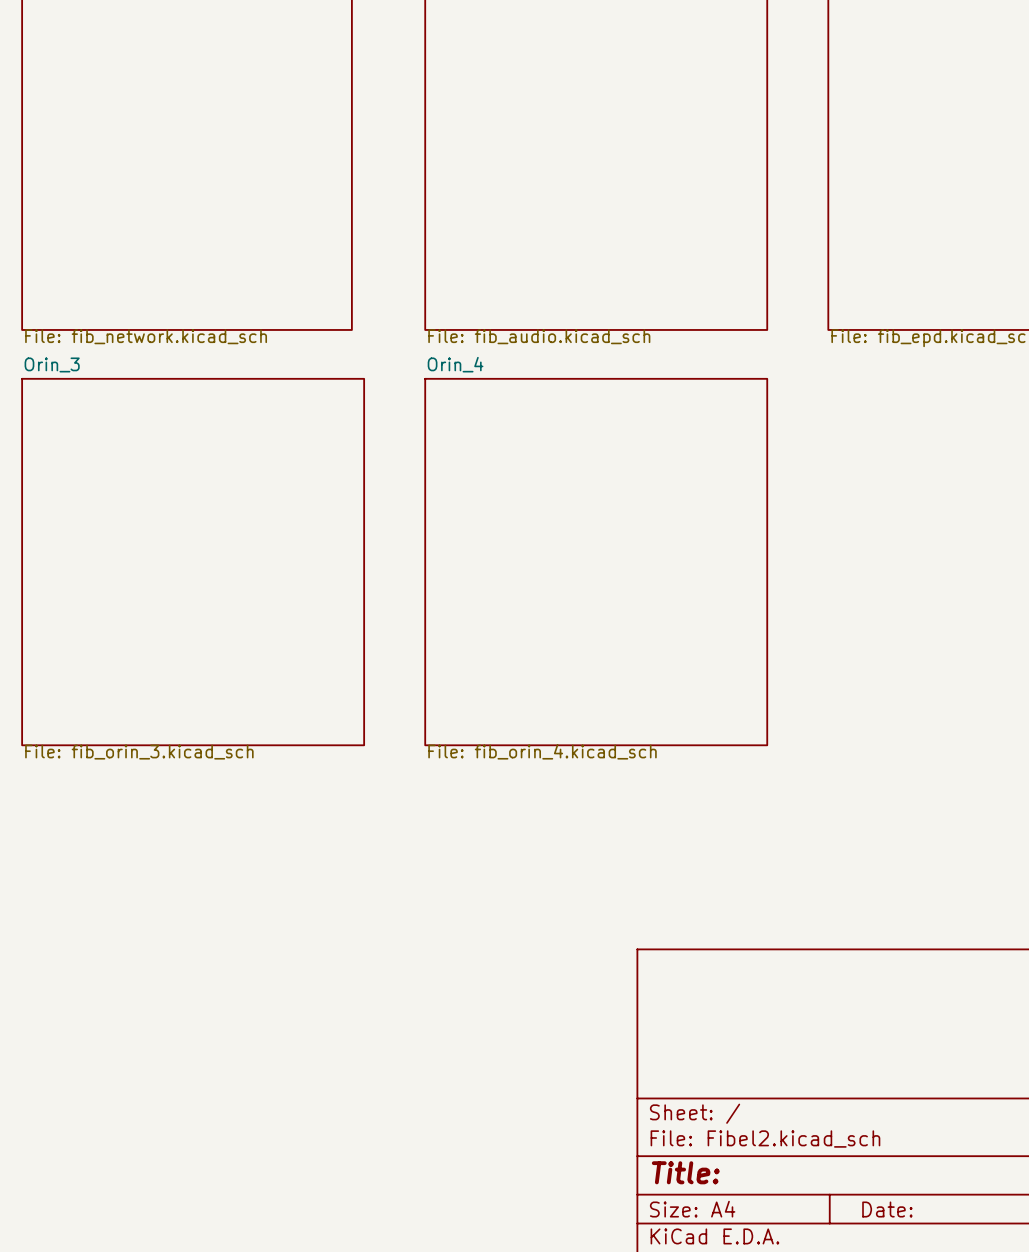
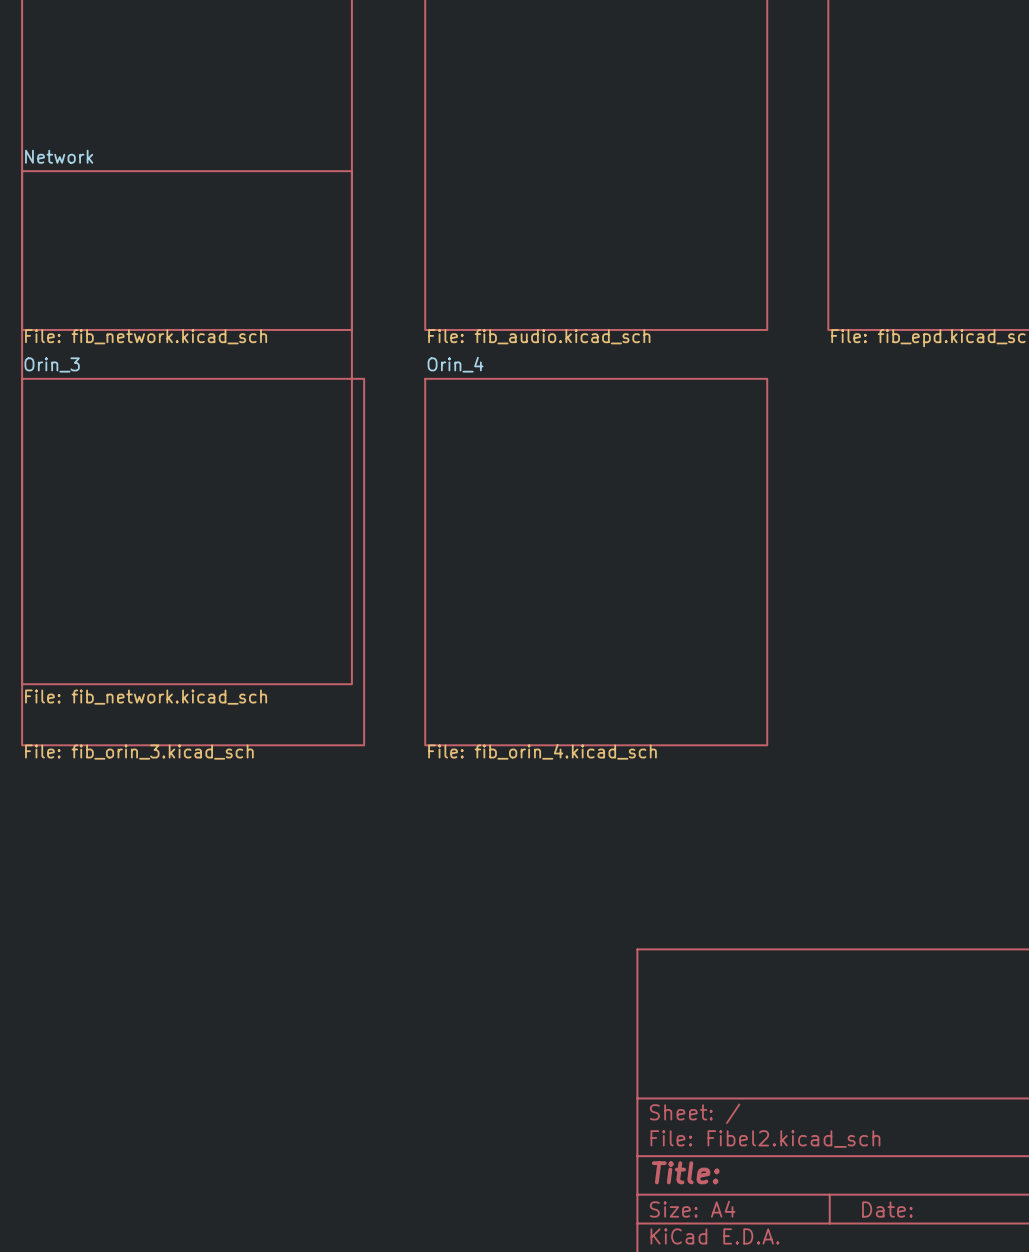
sheet Network: none -> File: fib_network.kicad_sch (187, 427)

